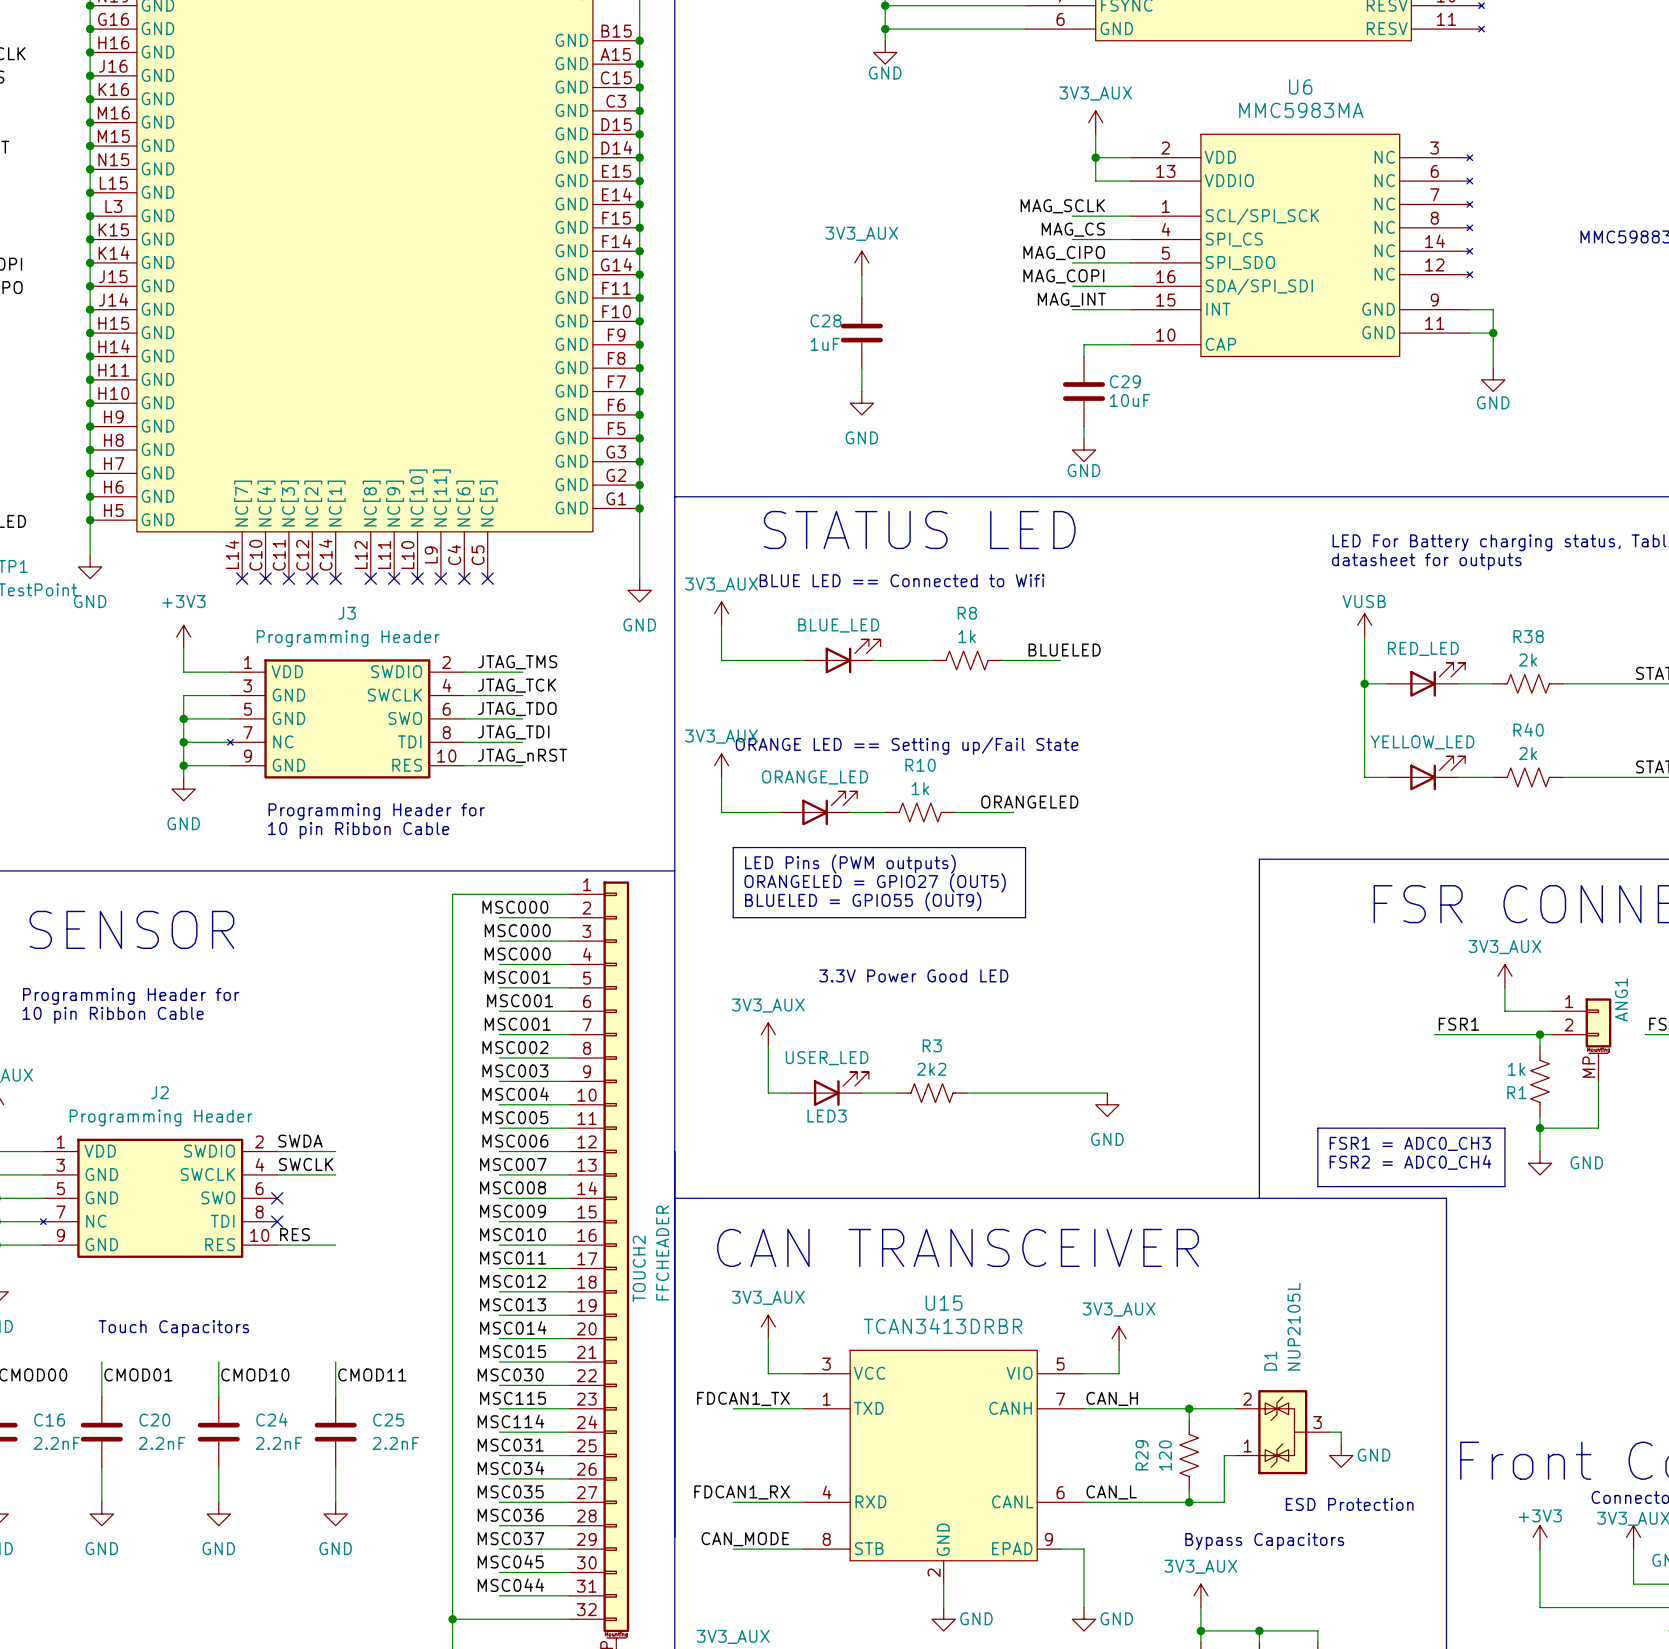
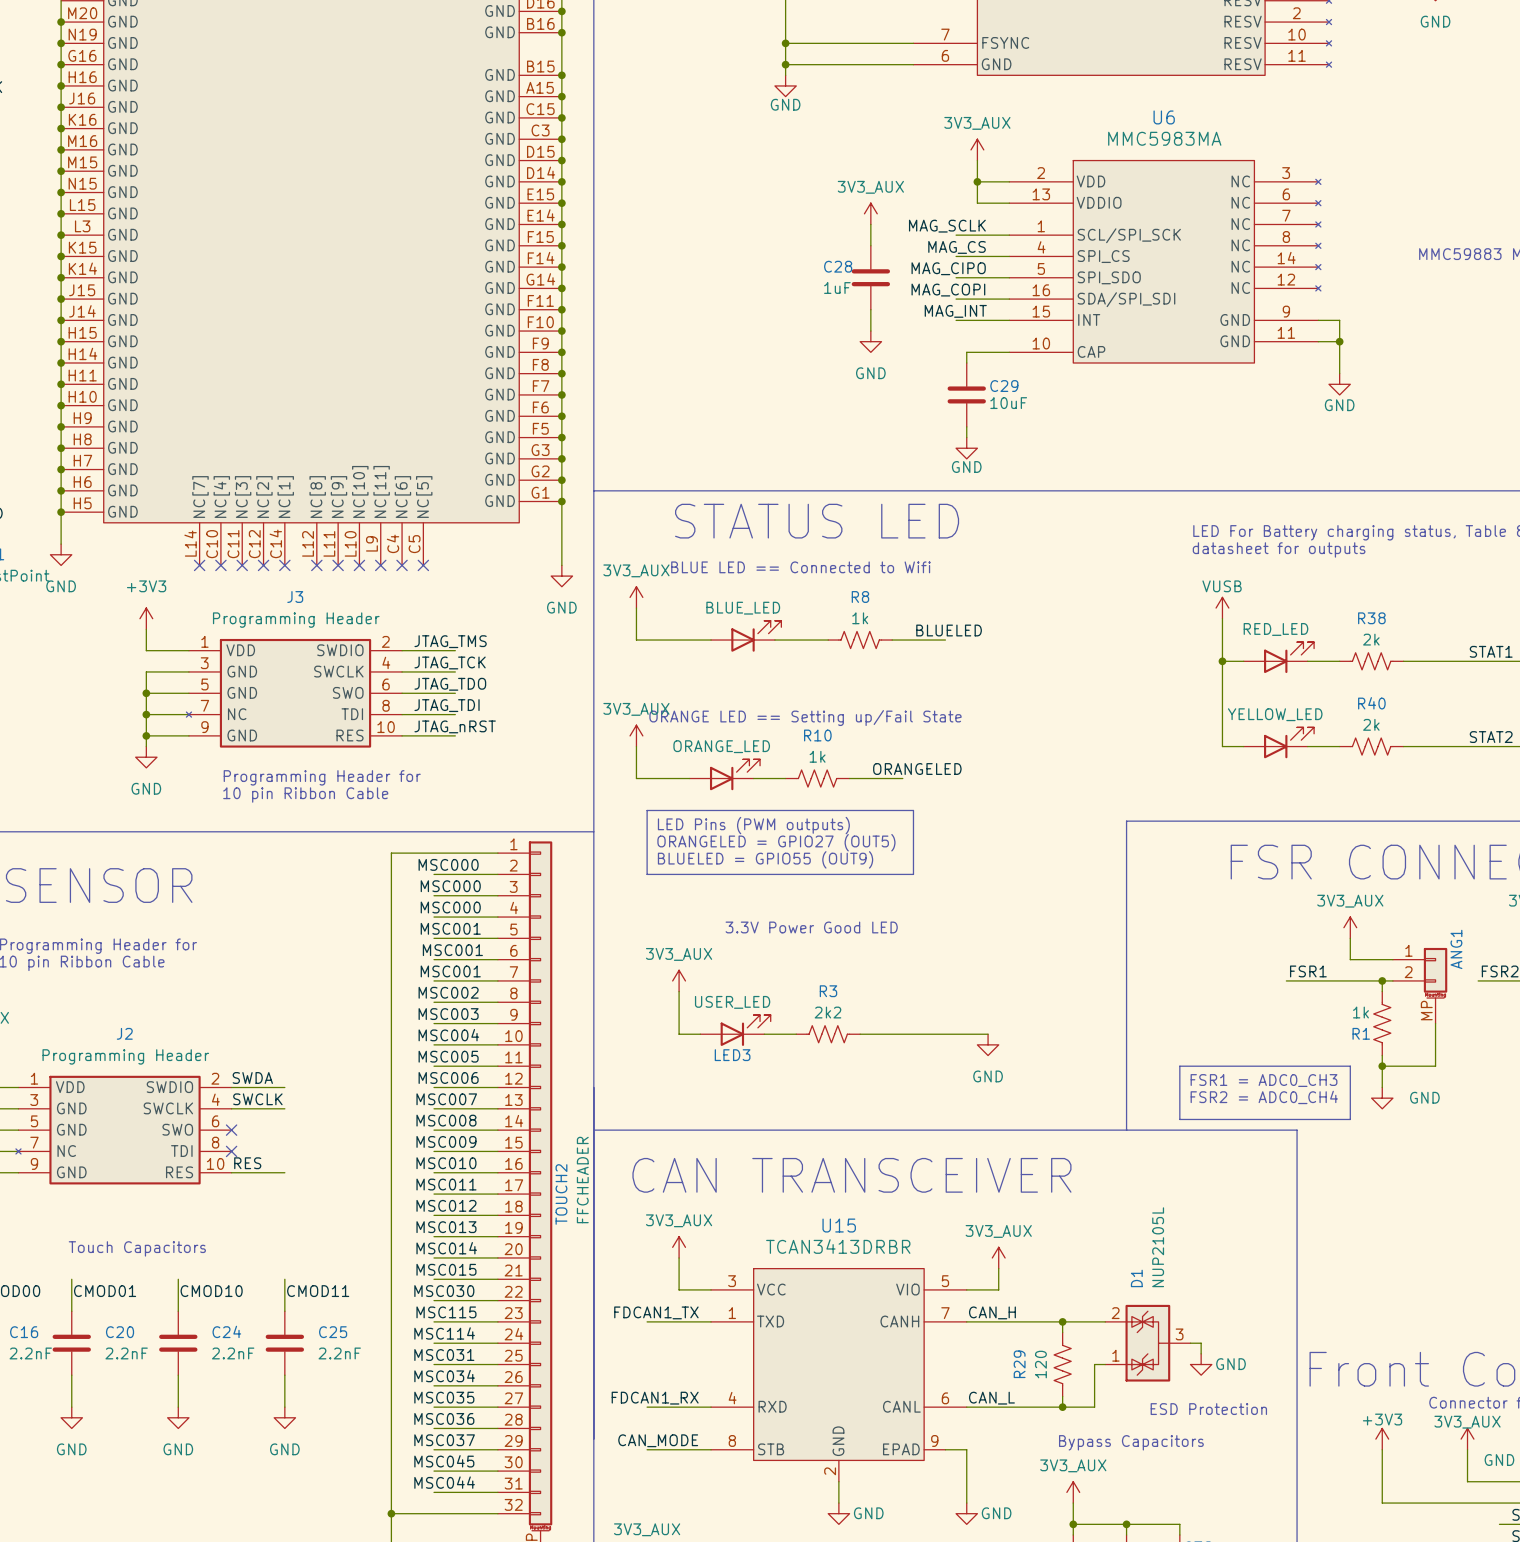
power symbol position: 3V3_AUX (861, 262) -> 3V3_AUX (870, 213)
wire: (861, 274) (861, 297) -> (870, 309) (870, 331)
C28 position: (861, 333) -> (870, 277)
wire: (861, 368) (861, 391) -> (870, 224) (870, 245)
power symbol position: GND (861, 403) -> GND (870, 341)

